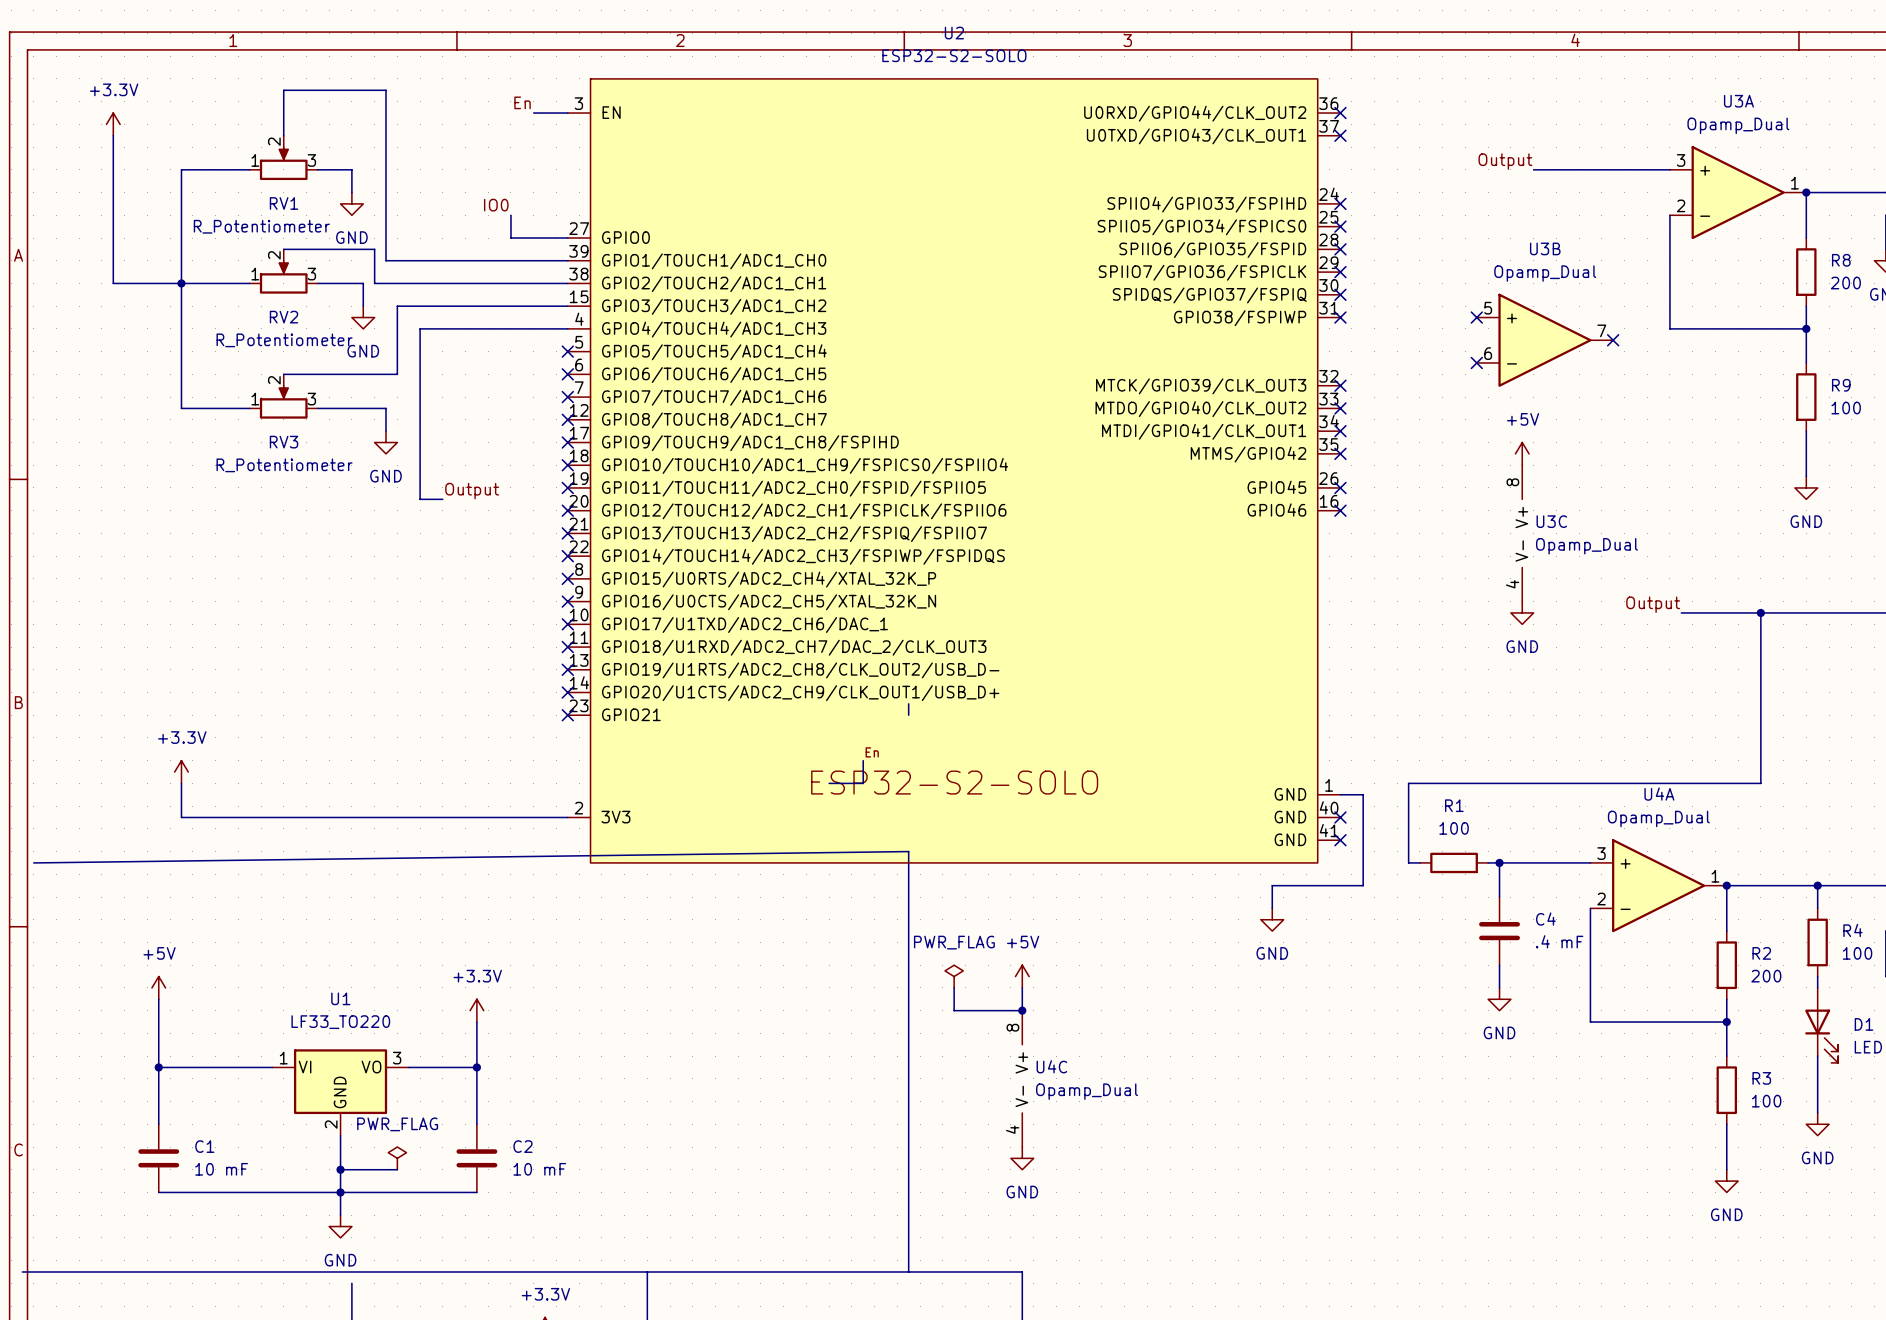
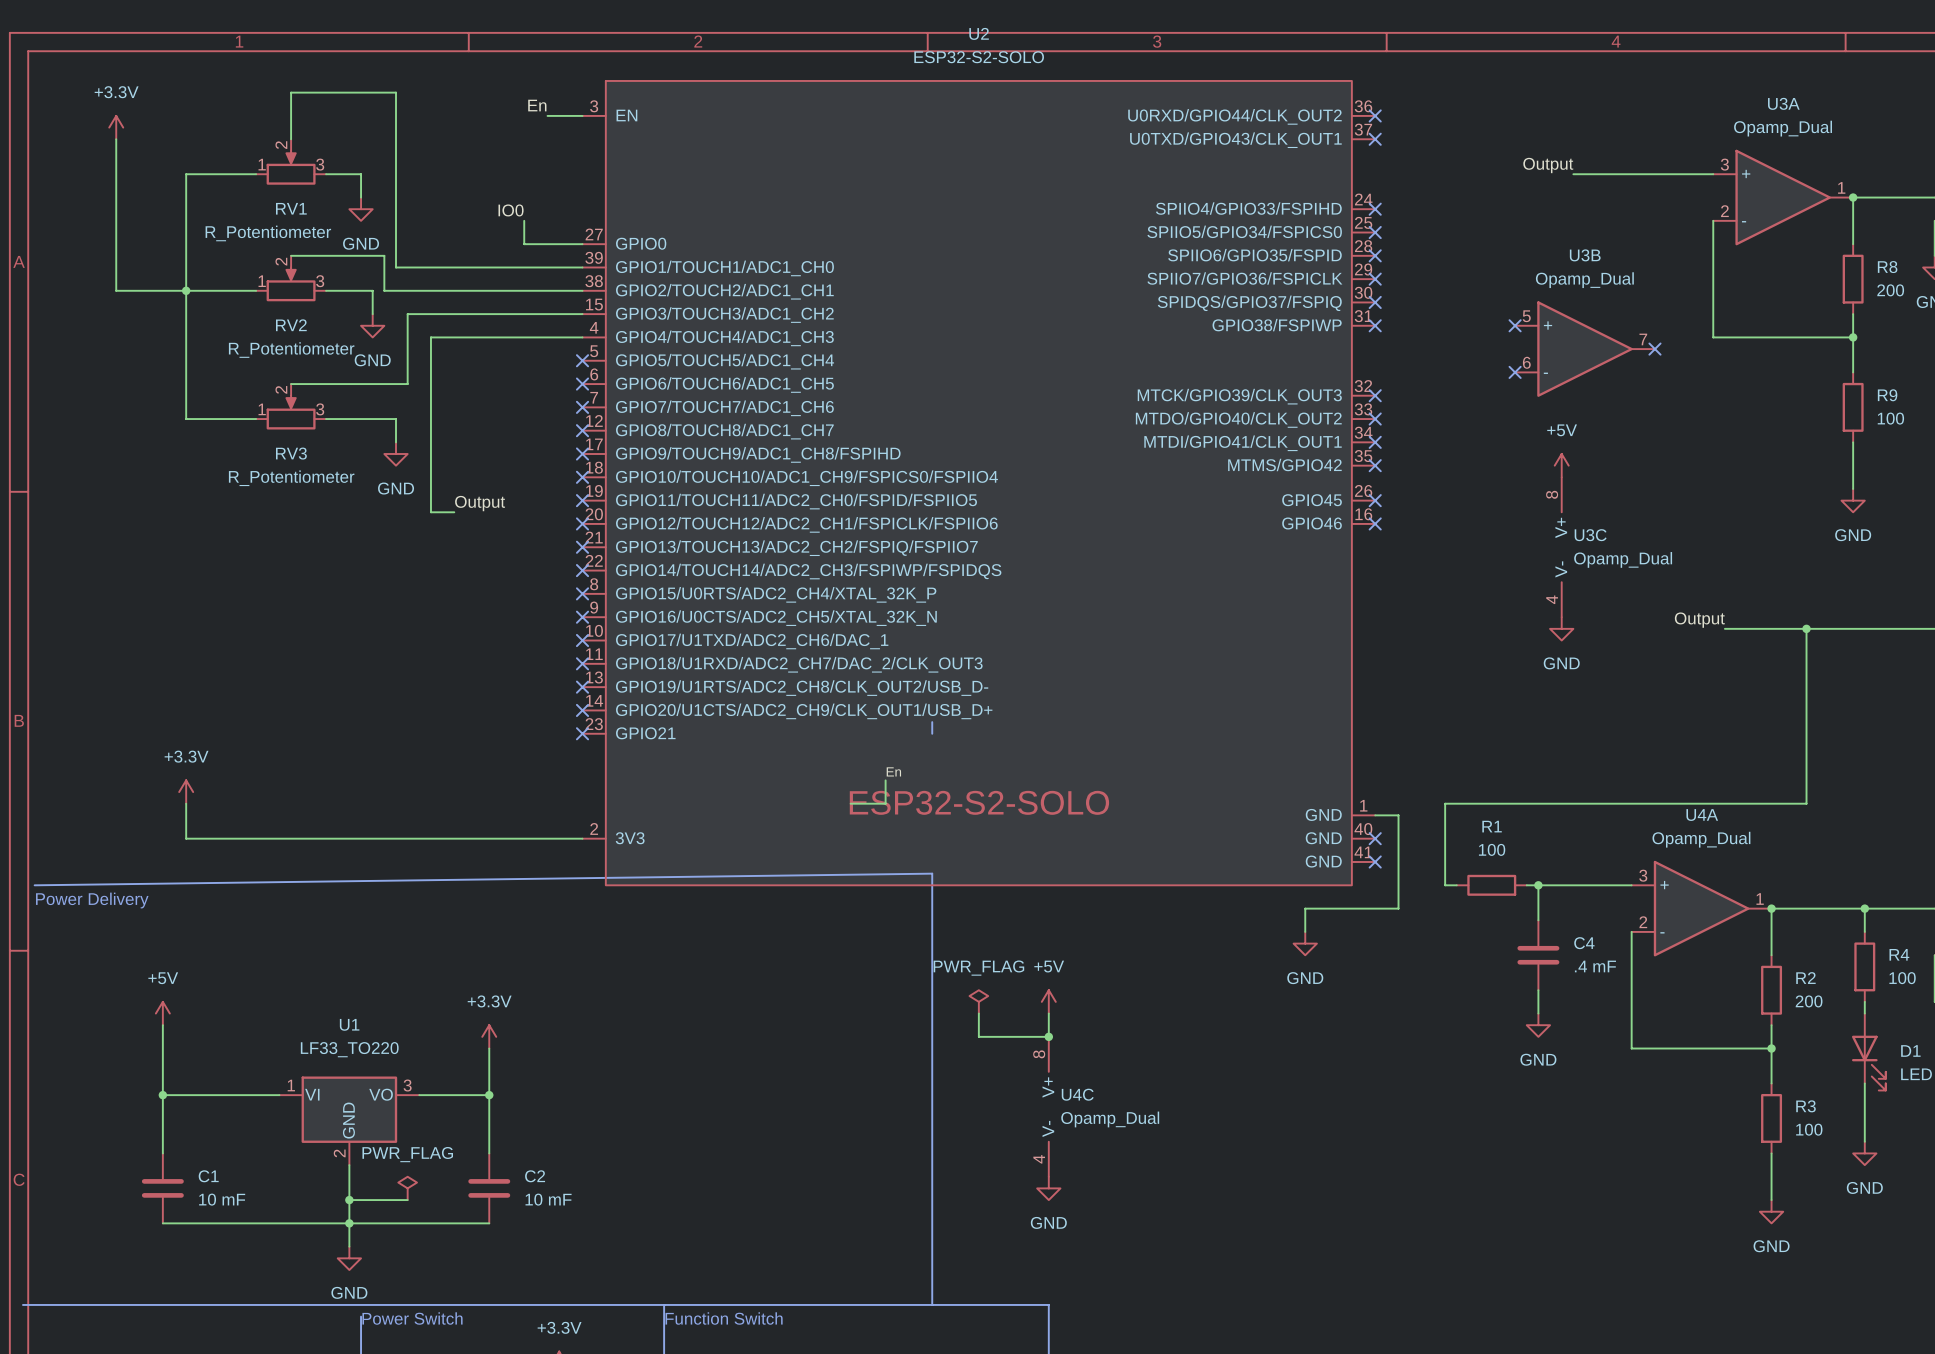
text: none -> Power Delivery (92, 900)
text: none -> Power Switch (412, 1318)
text: none -> Function Switch (724, 1318)

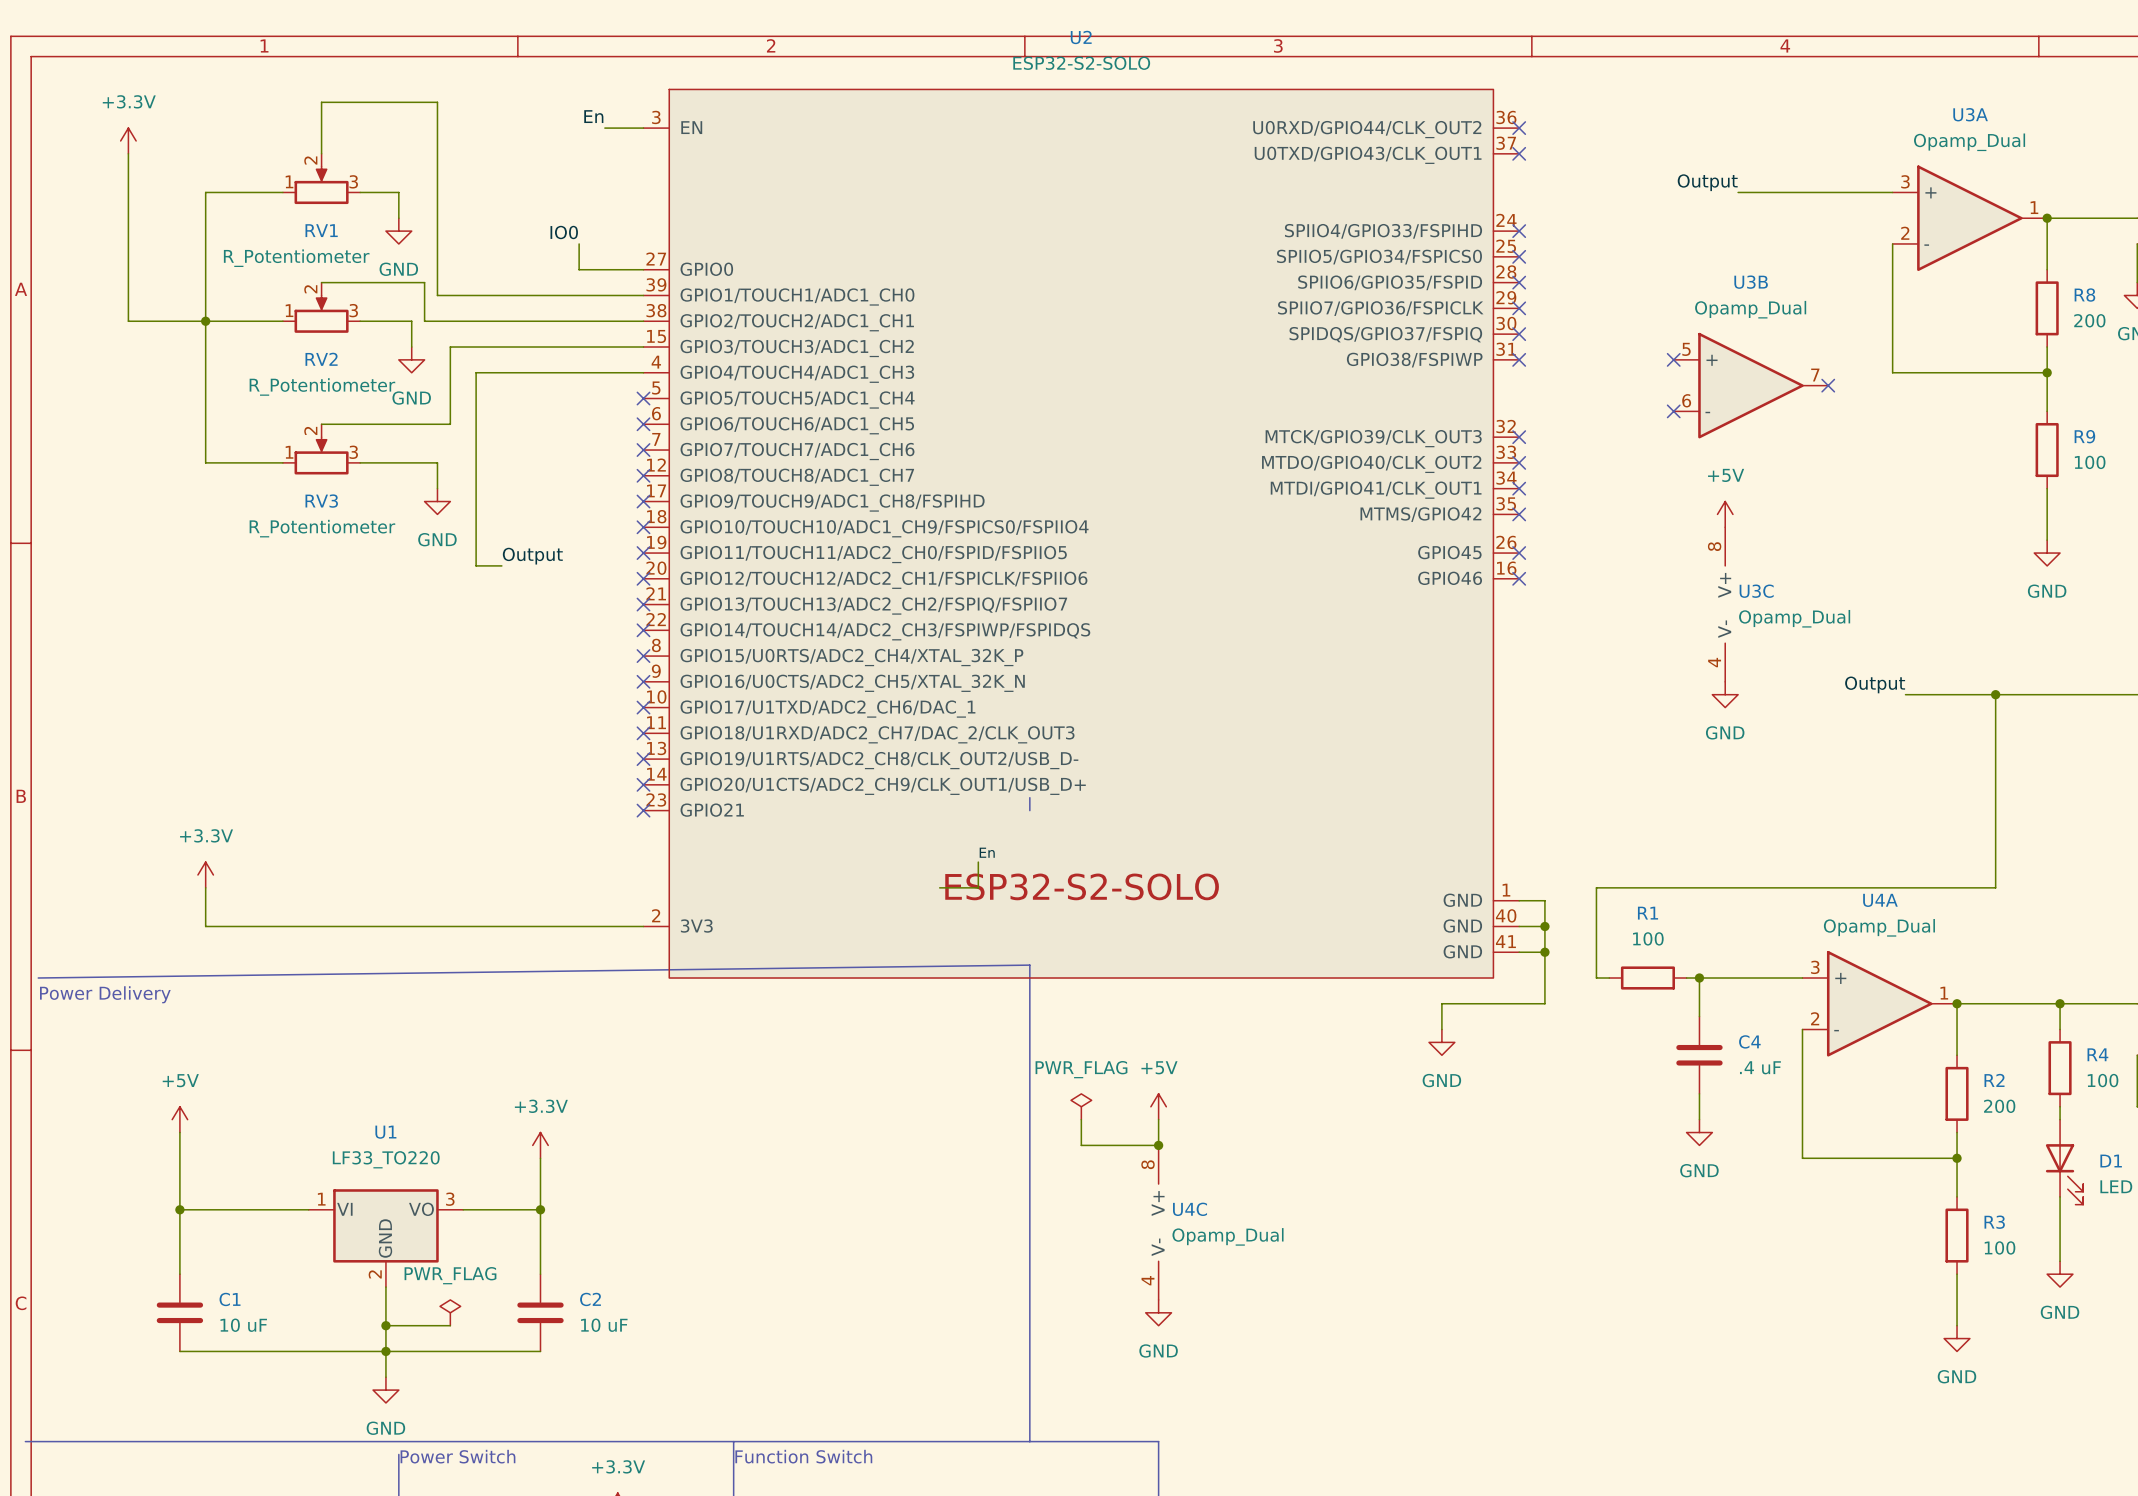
wire: none -> (1519, 926) (1544, 926)
no-connect mark: (1375, 838) -> none
junction: none -> (1544, 926)
wire: none -> (1519, 952) (1544, 952)
no-connect mark: (1375, 862) -> none
junction: none -> (1544, 952)
C4 value: .4 mF (1595, 966) -> .4 uF (1760, 1067)
C1 value: 10 mF (222, 1199) -> 10 uF (243, 1325)
C2 value: 10 mF (548, 1199) -> 10 uF (604, 1325)

